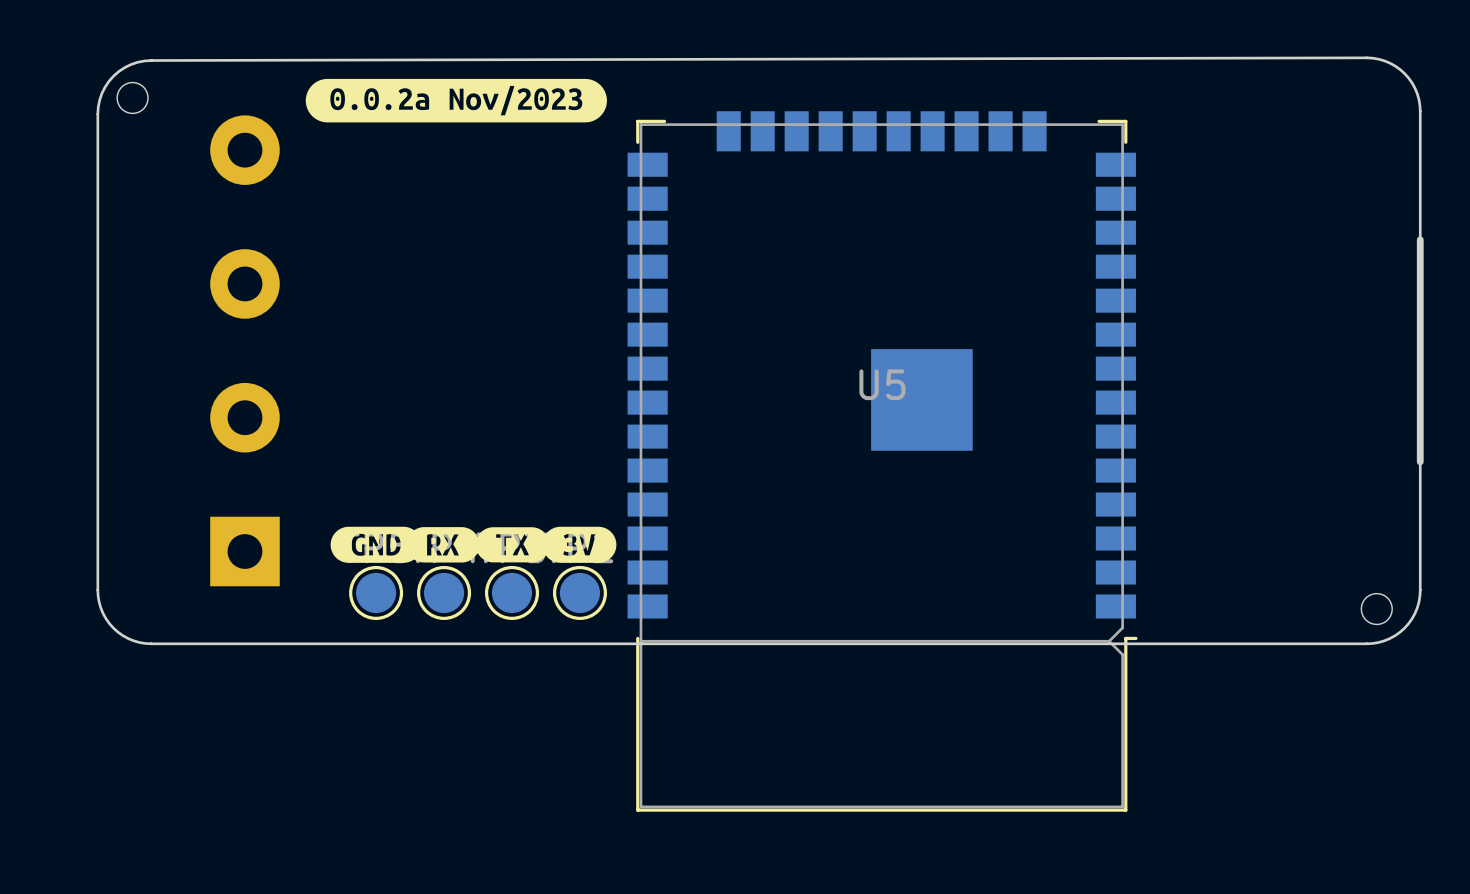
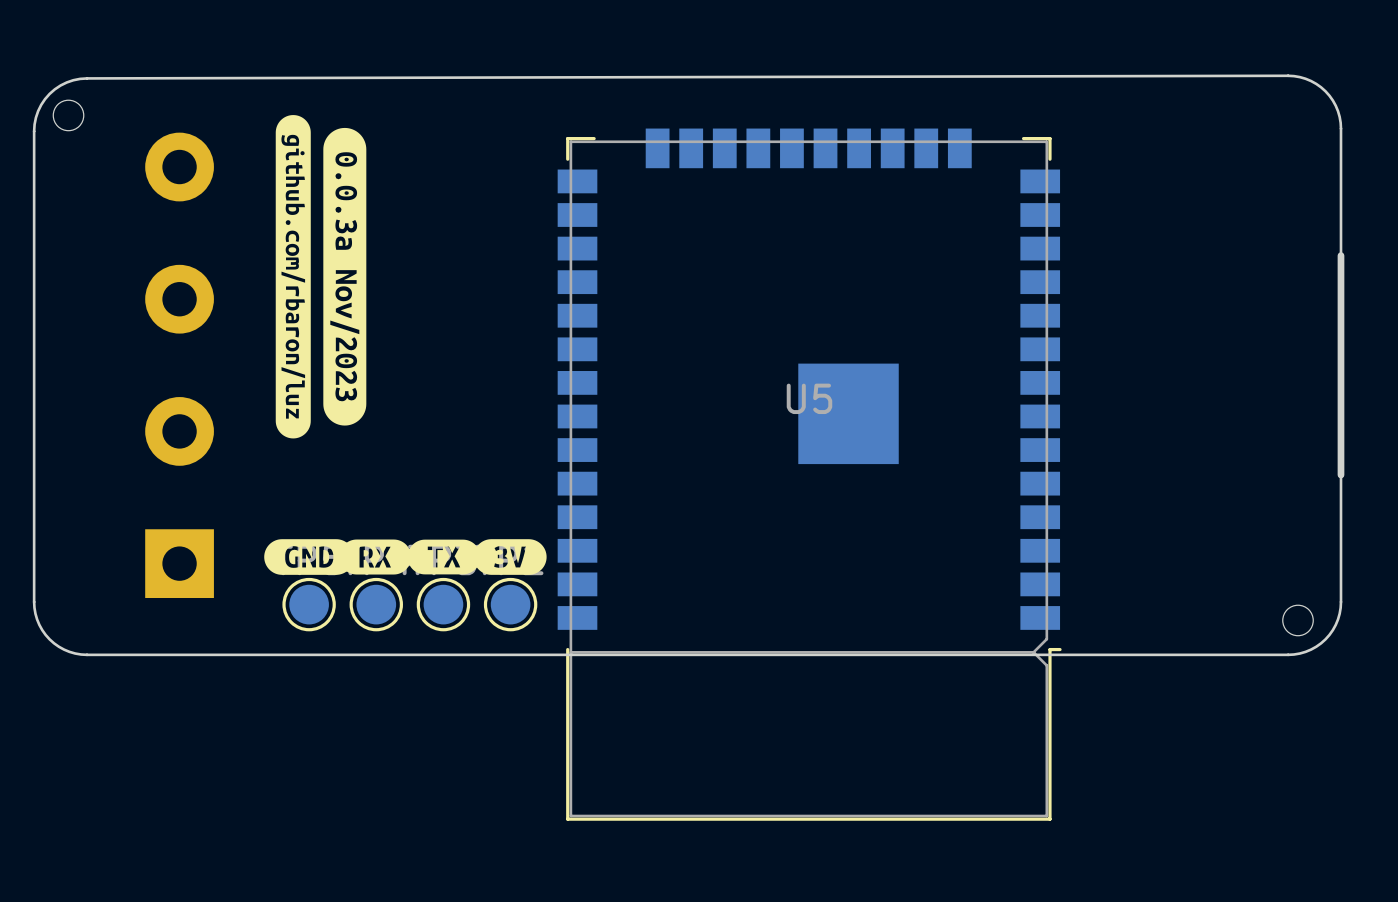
drawing: [305, 78, 607, 123] -> none
drawing: none -> [275, 115, 367, 439]

